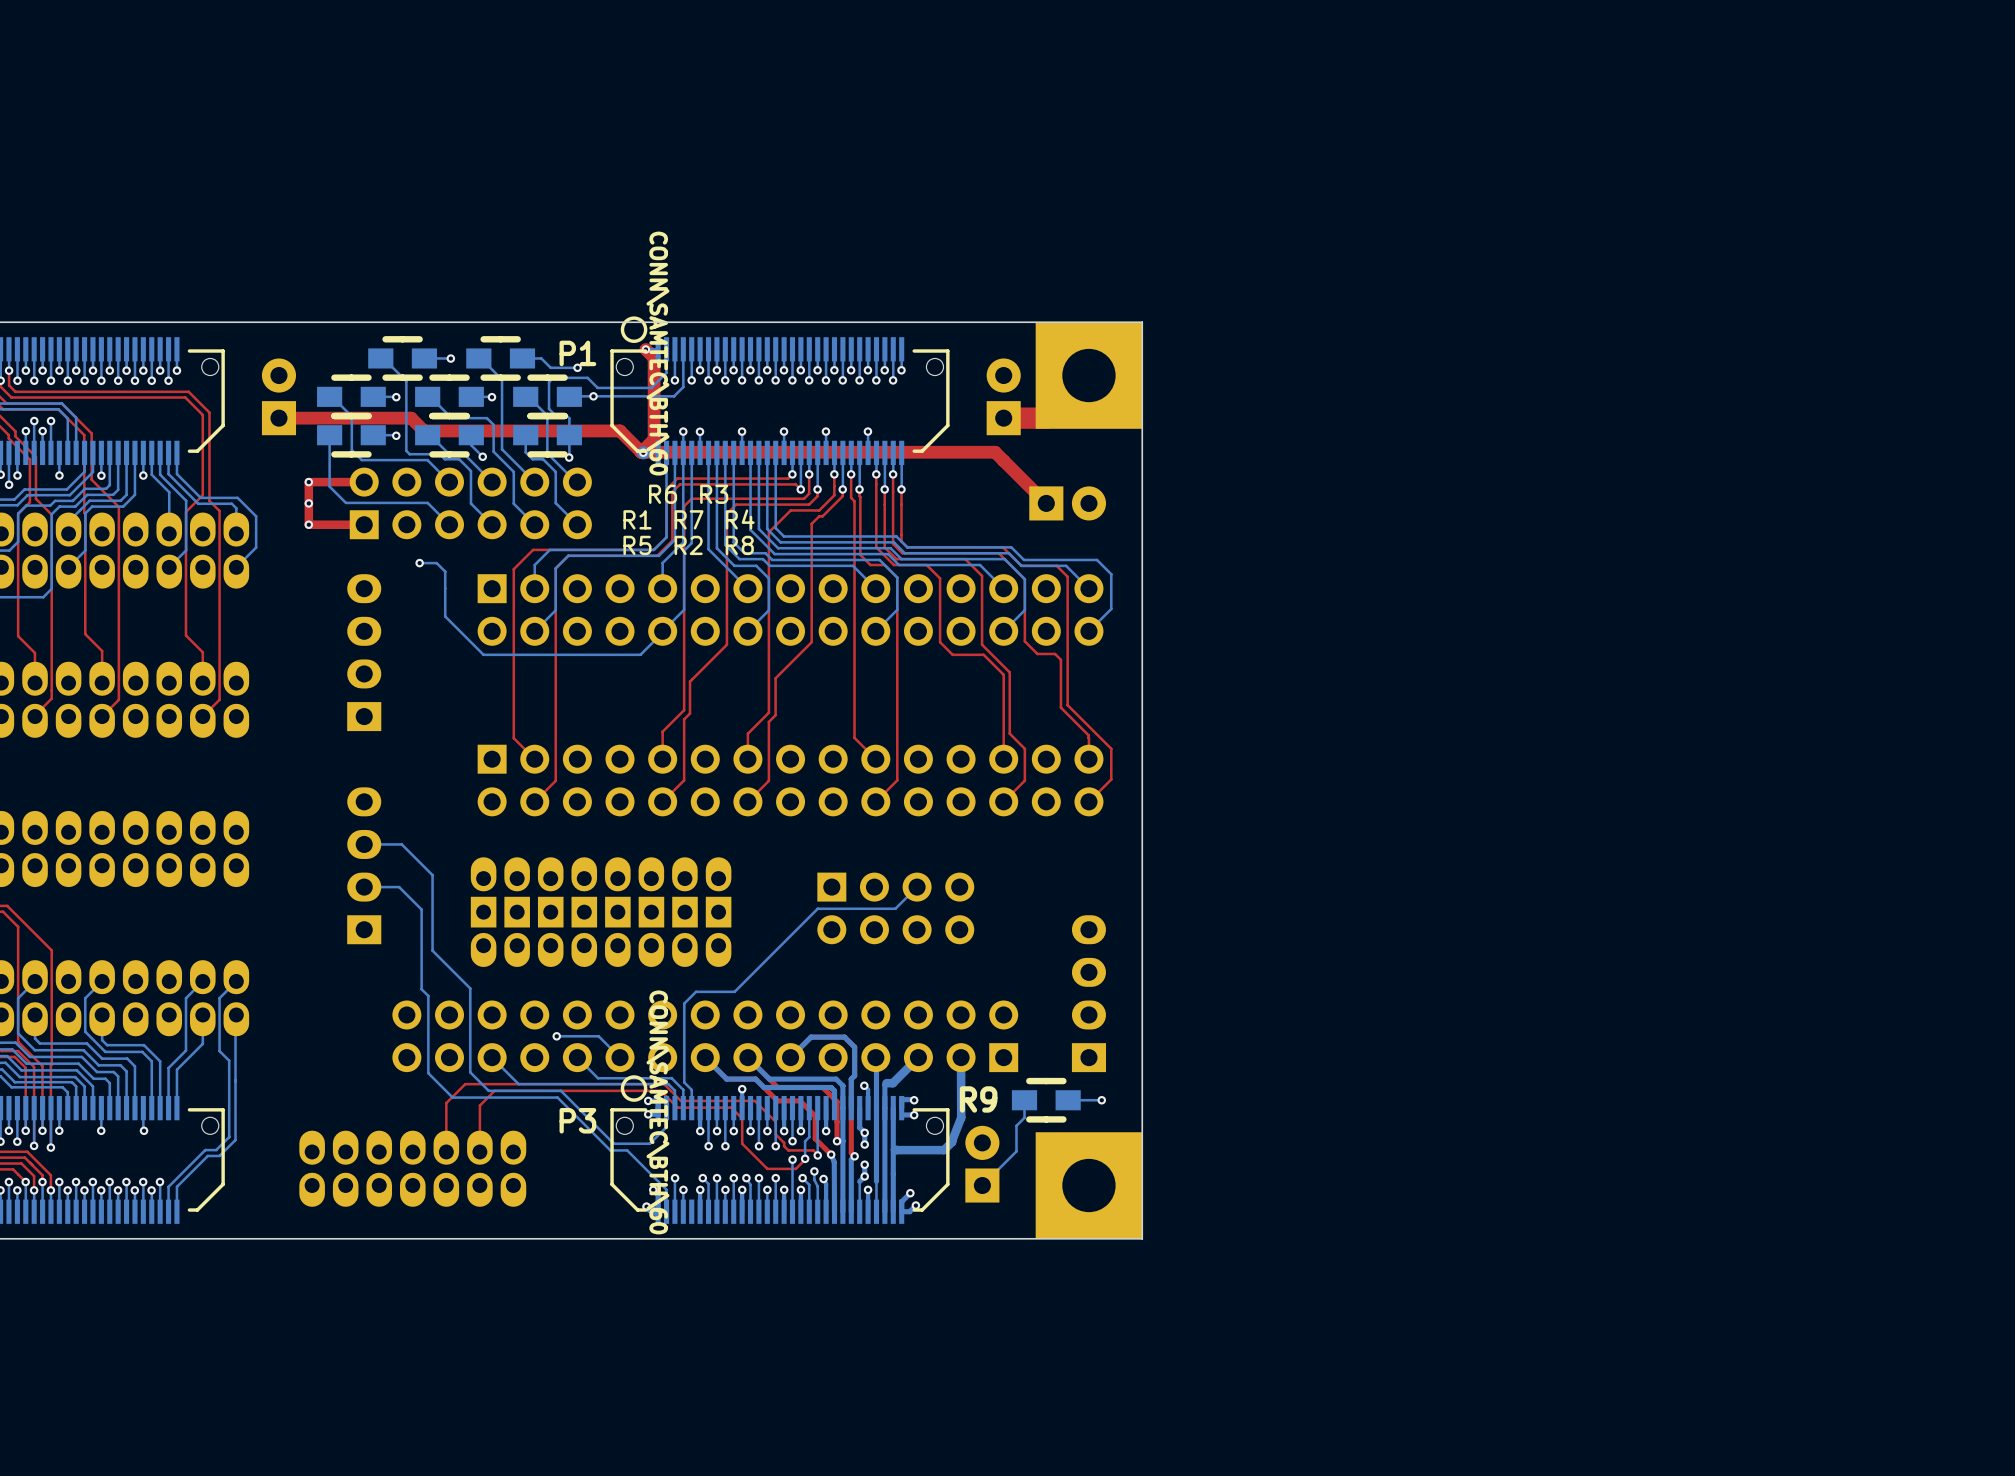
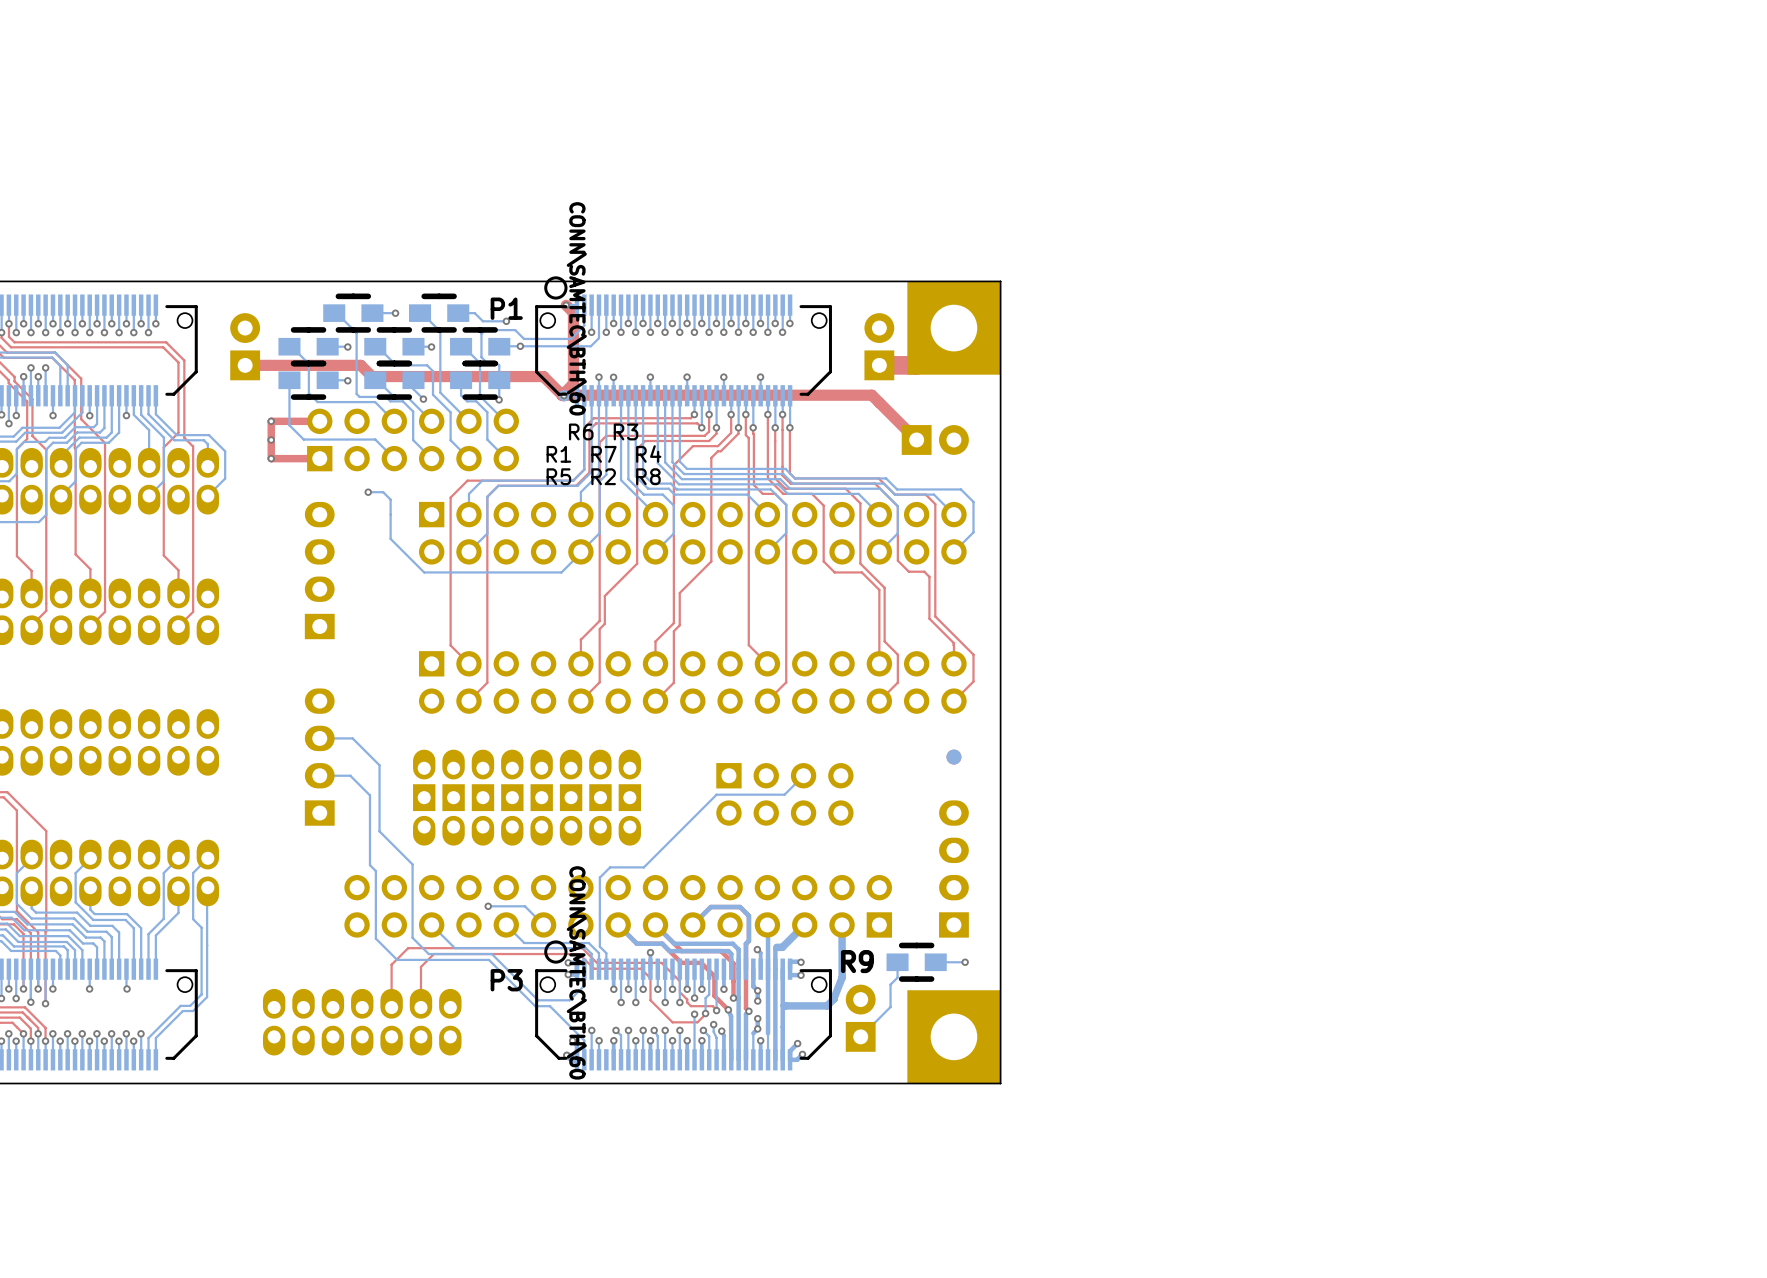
part: none -> (953, 757)

